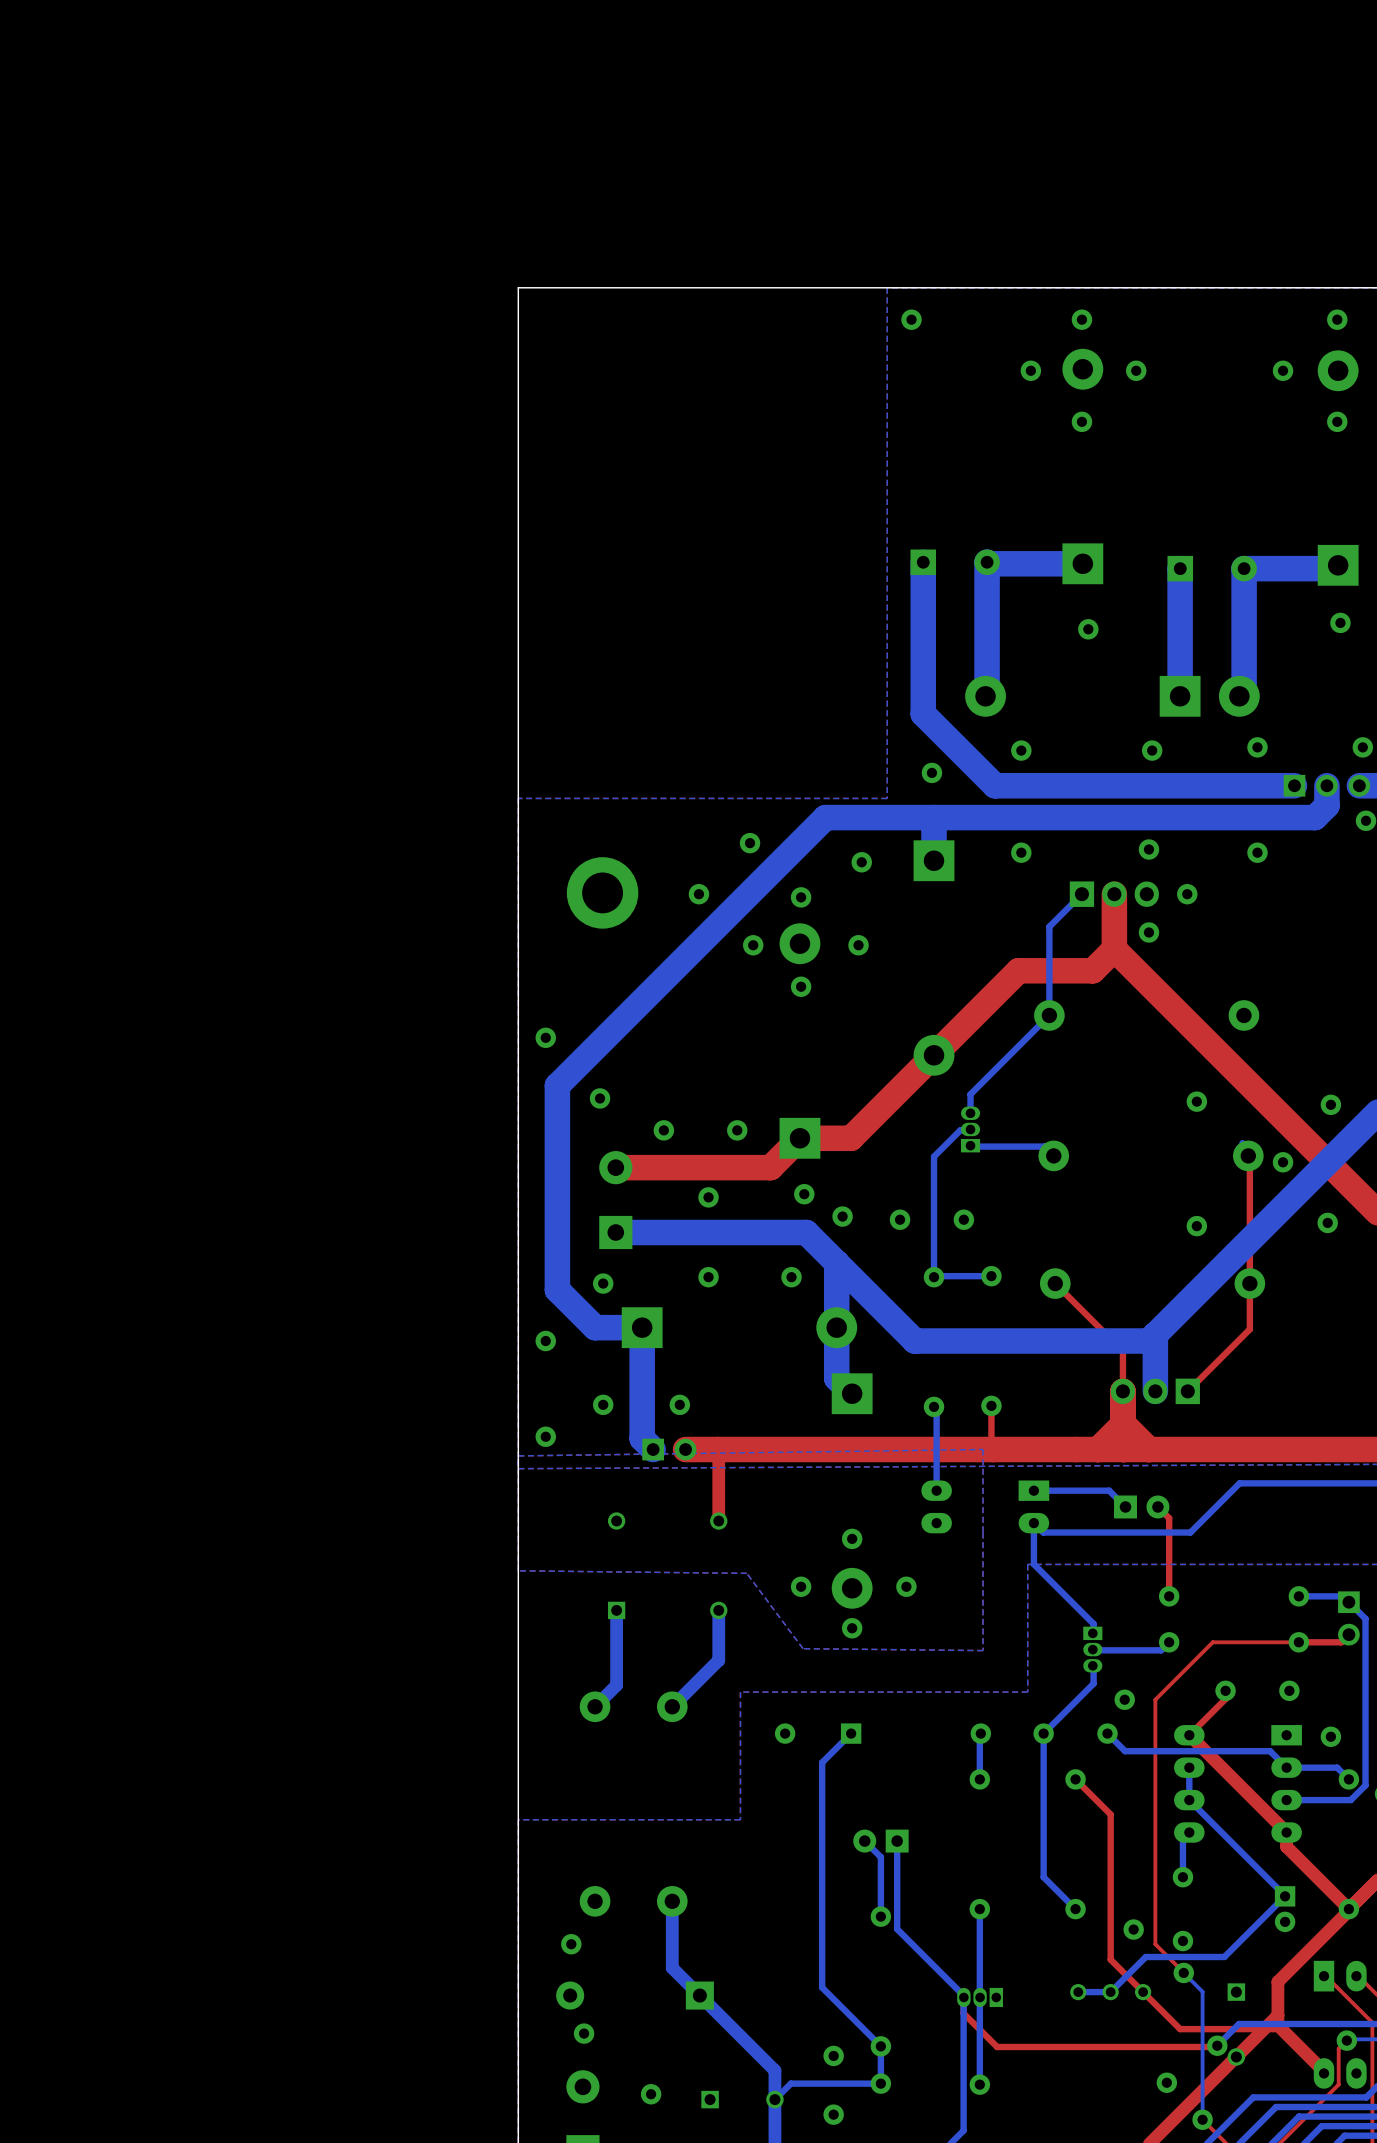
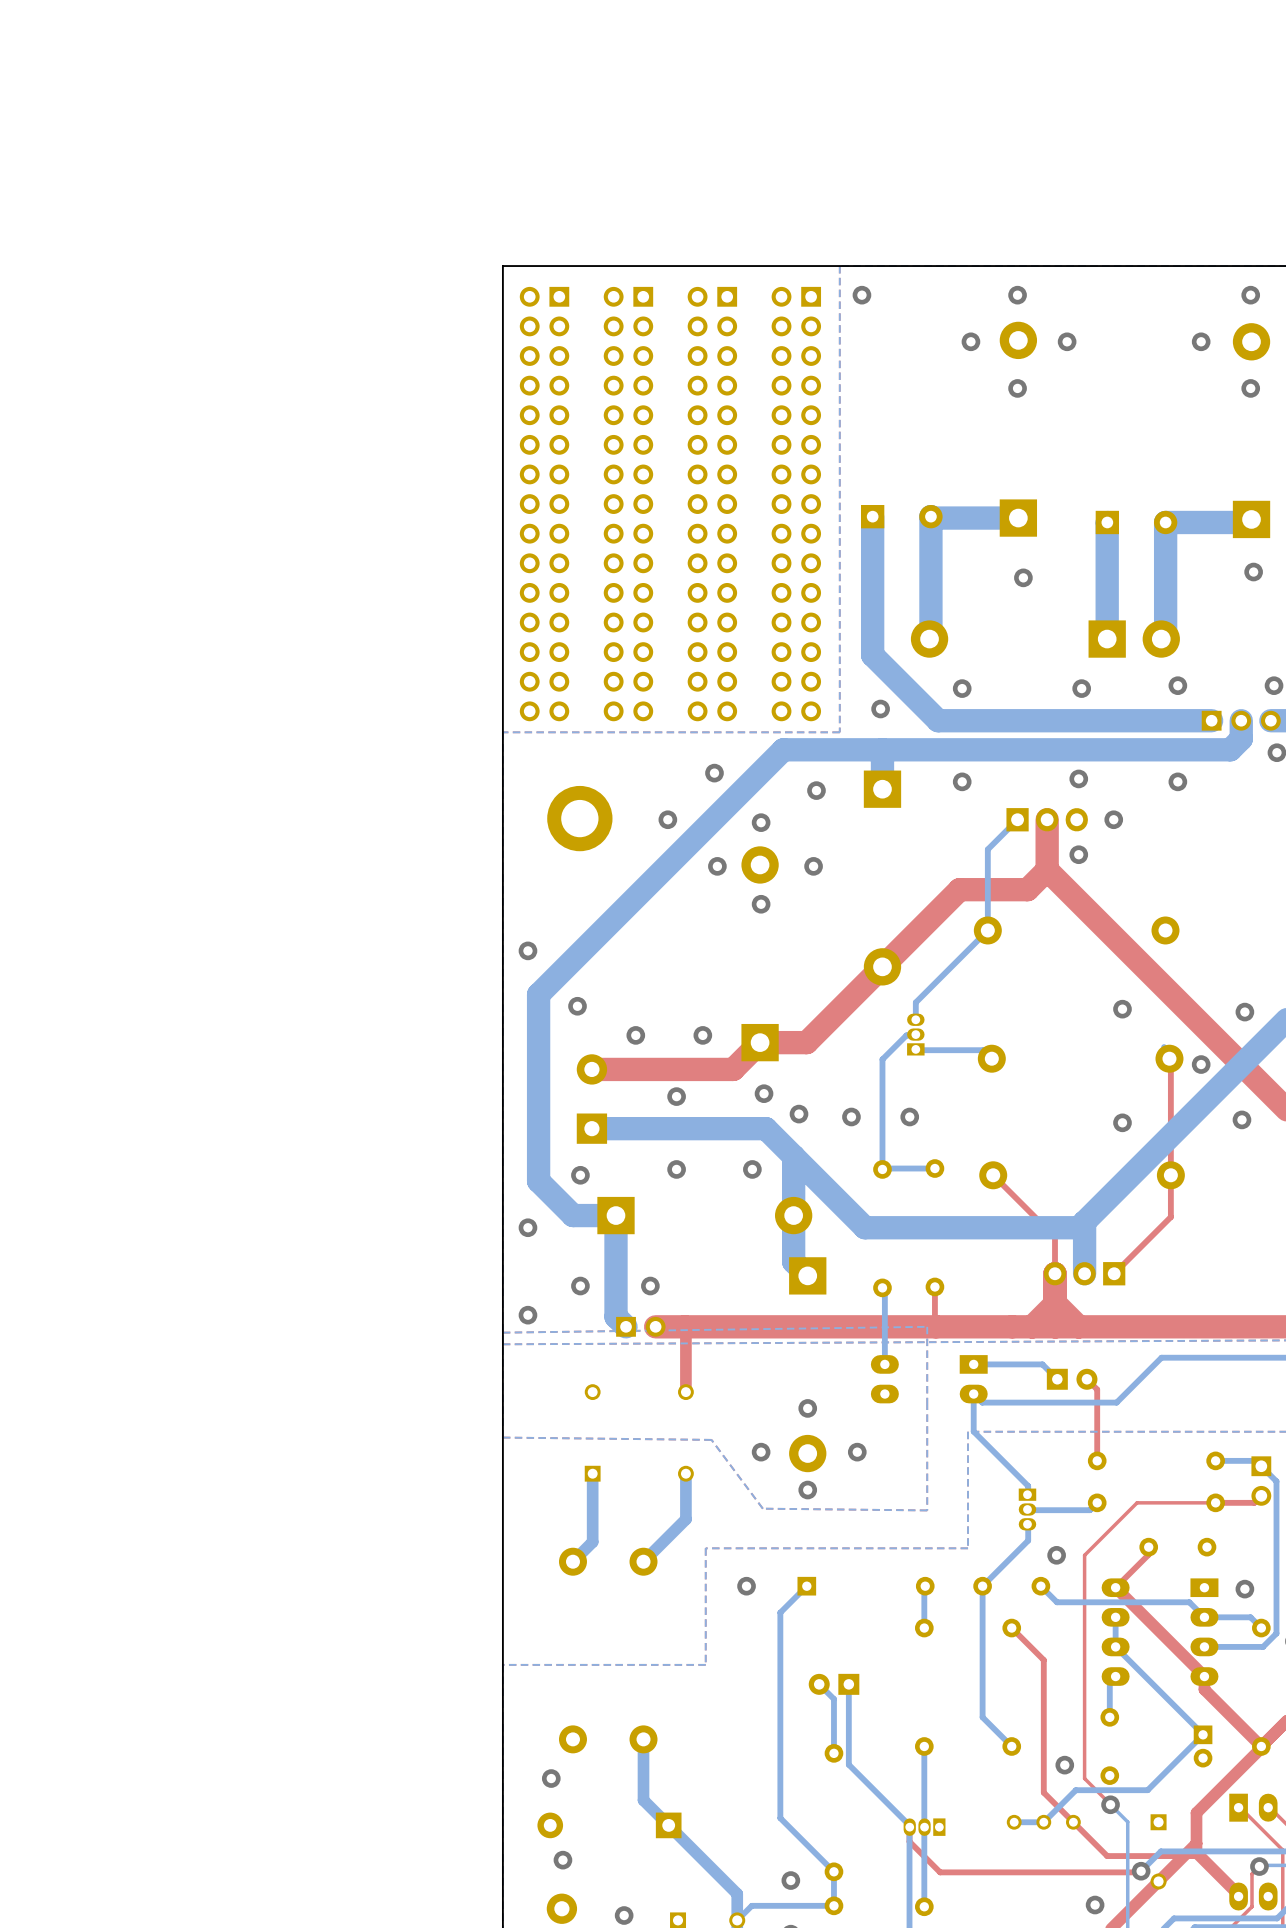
part: none -> (544, 504)
part: none -> (628, 504)
part: none -> (712, 504)
part: none -> (796, 504)

